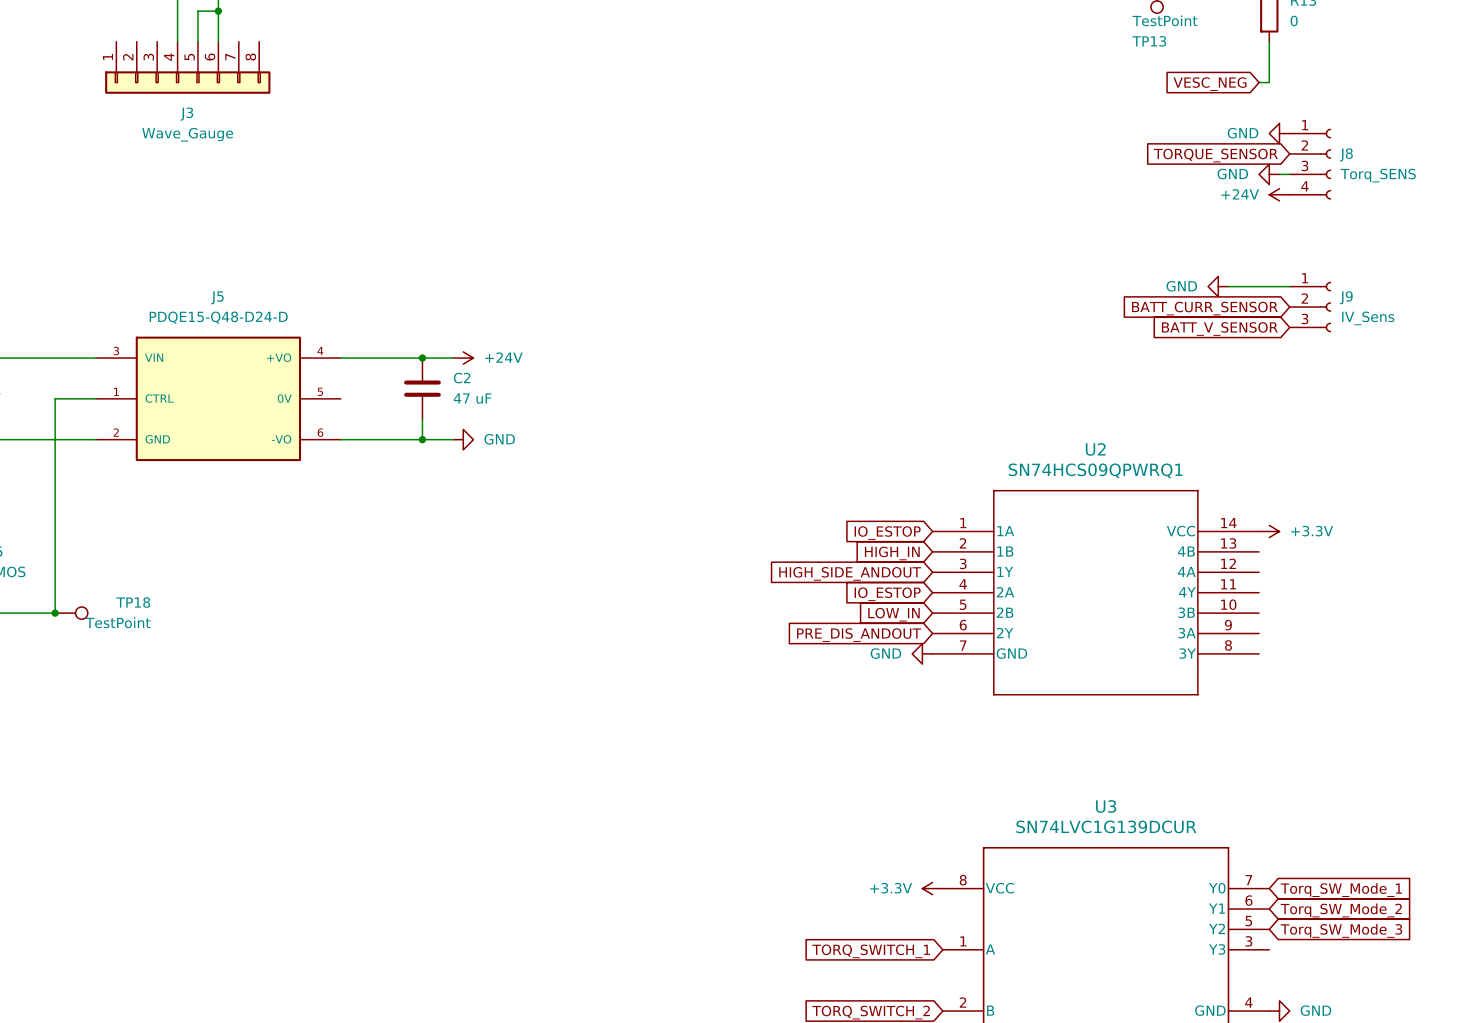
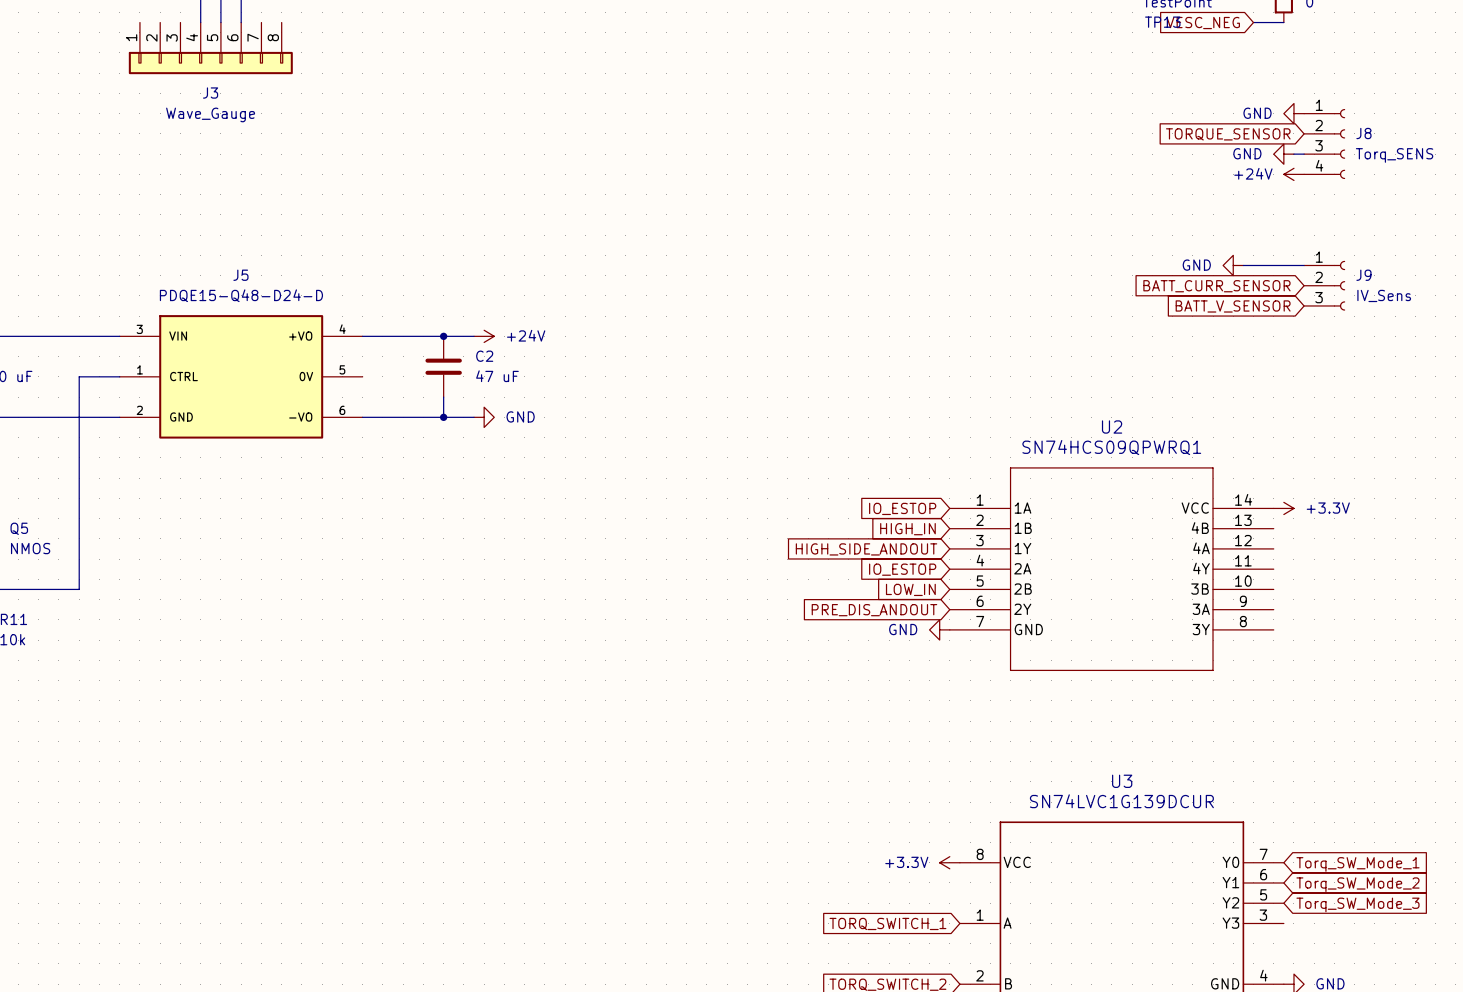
wire: (1269, 41) (1269, 82) (1259, 82) -> (1283, 22) (1253, 22)
global label position: VESC_NEG (1209, 84) -> VESC_NEG (1203, 23)
junction: (55, 613) -> none
TP18: TestPoint (71, 613) -> none

